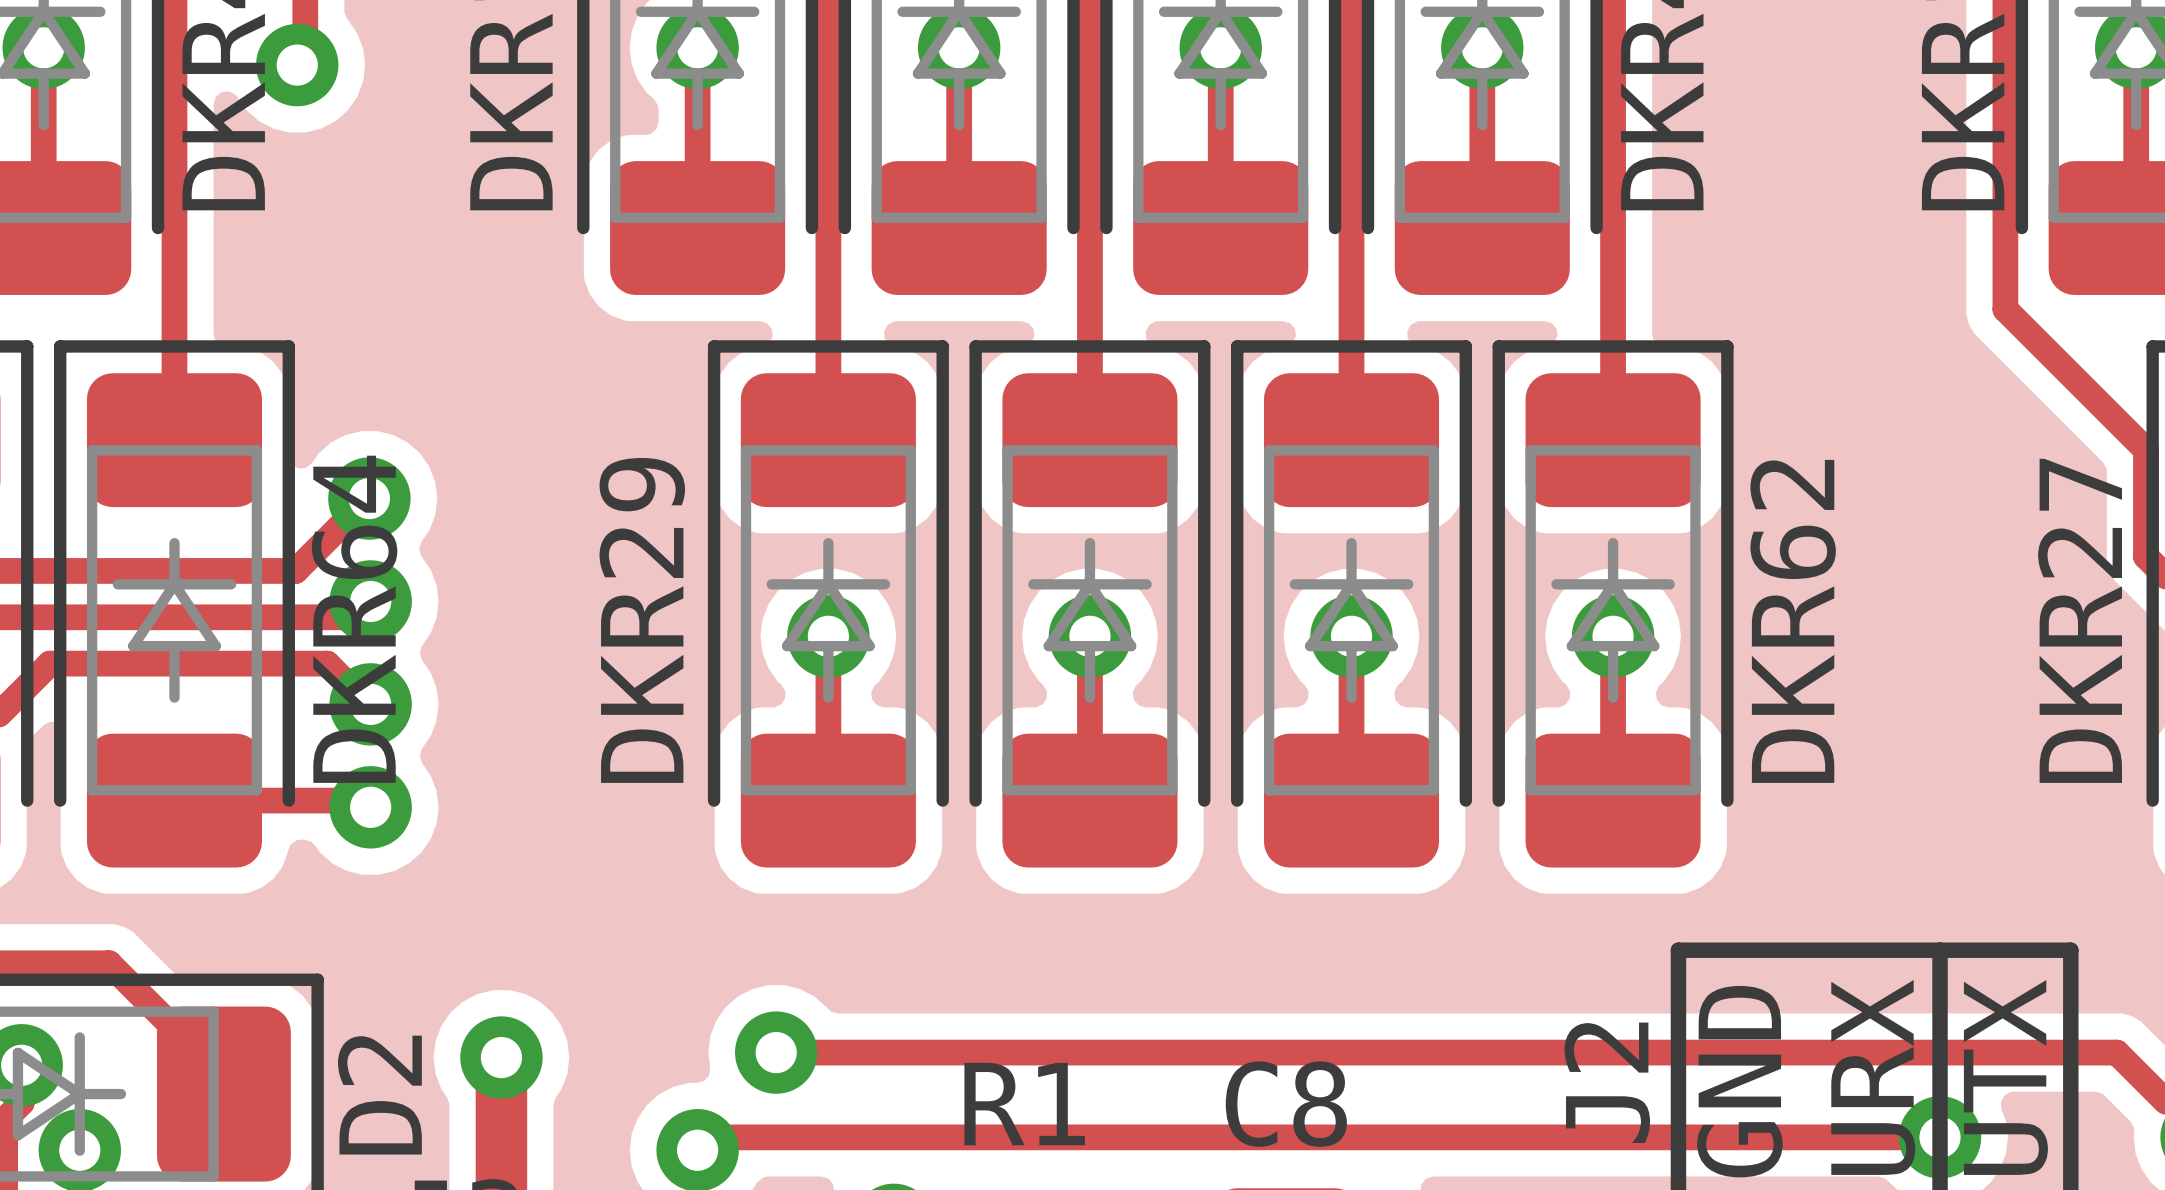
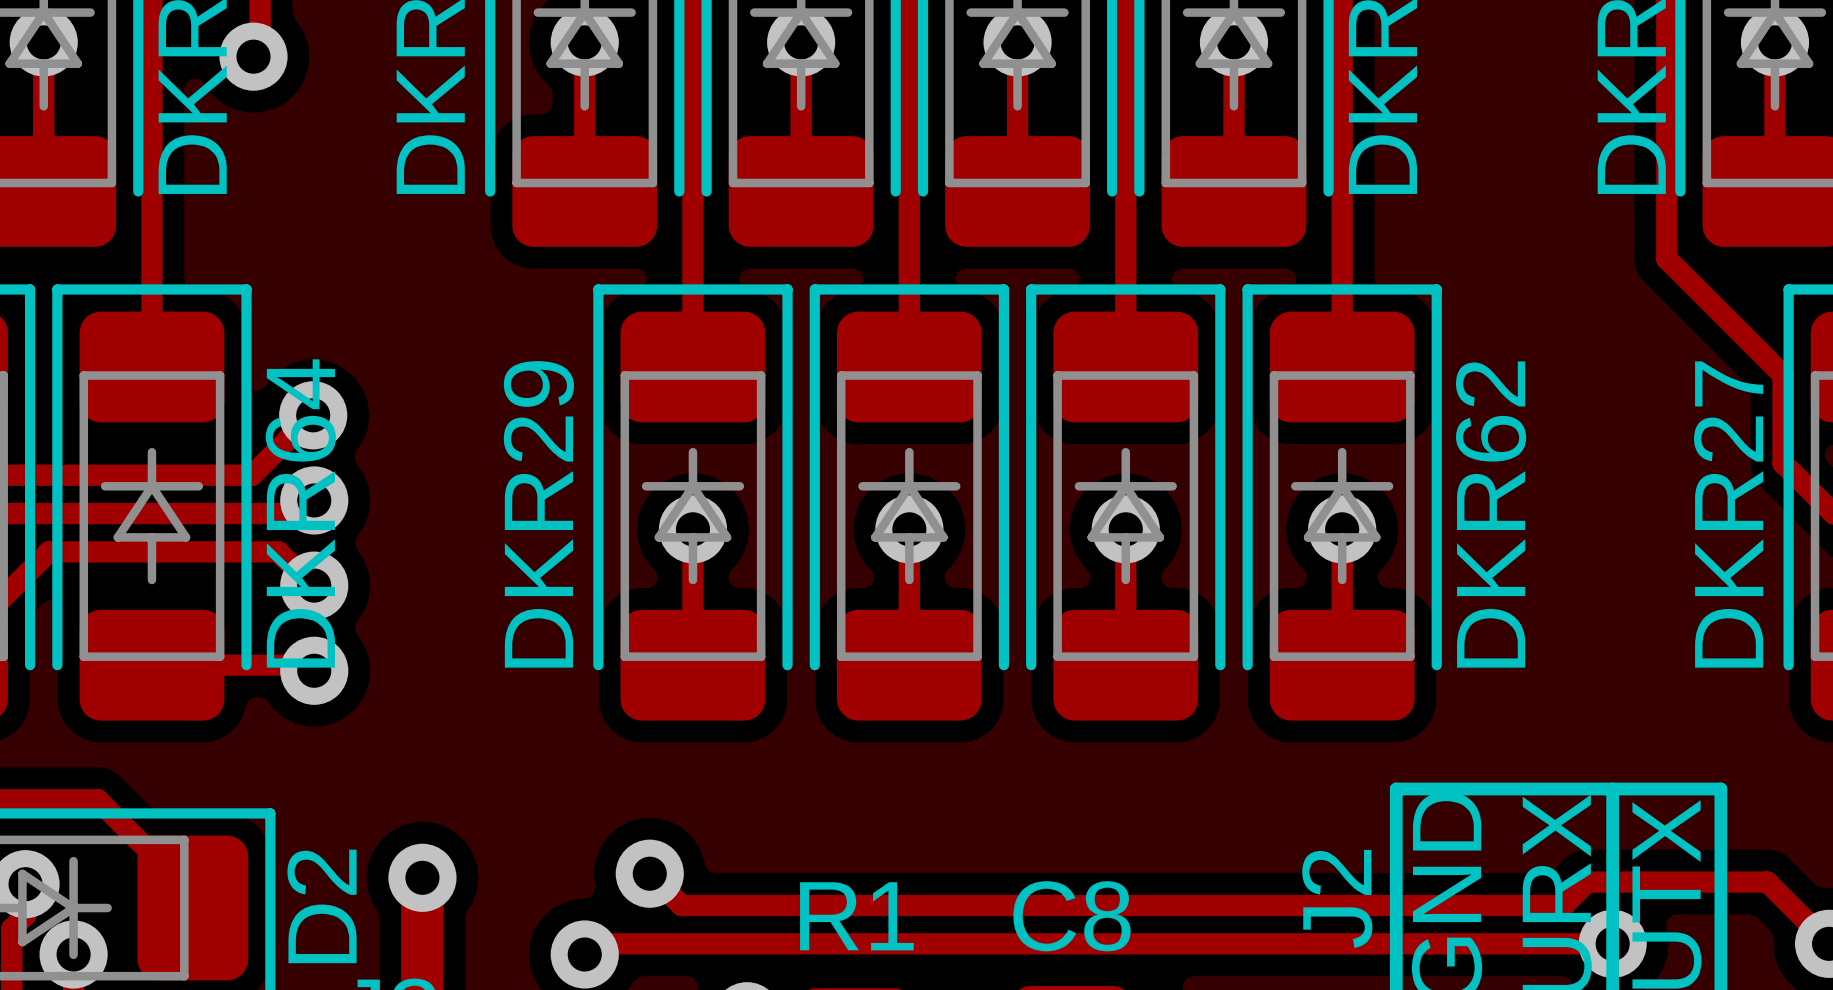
track: (776, 1052) (2116, 1052) (2126, 1062) -> (649, 873) (681, 905) (1563, 905) (1587, 882) (1767, 882)

